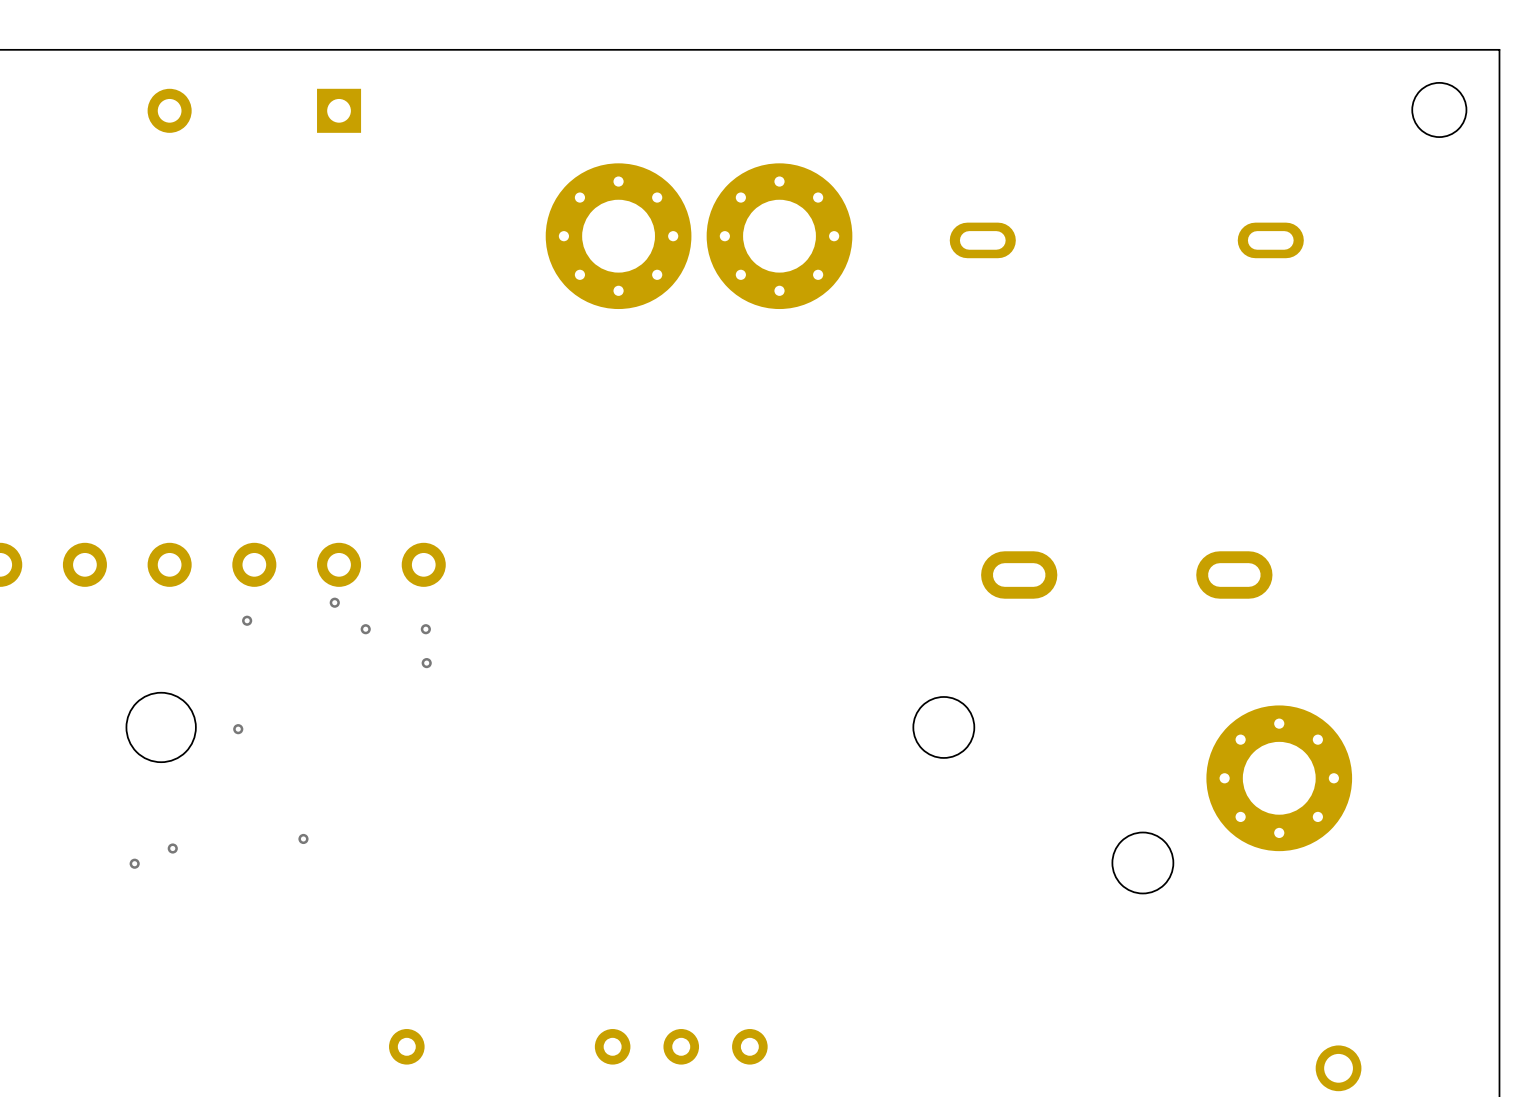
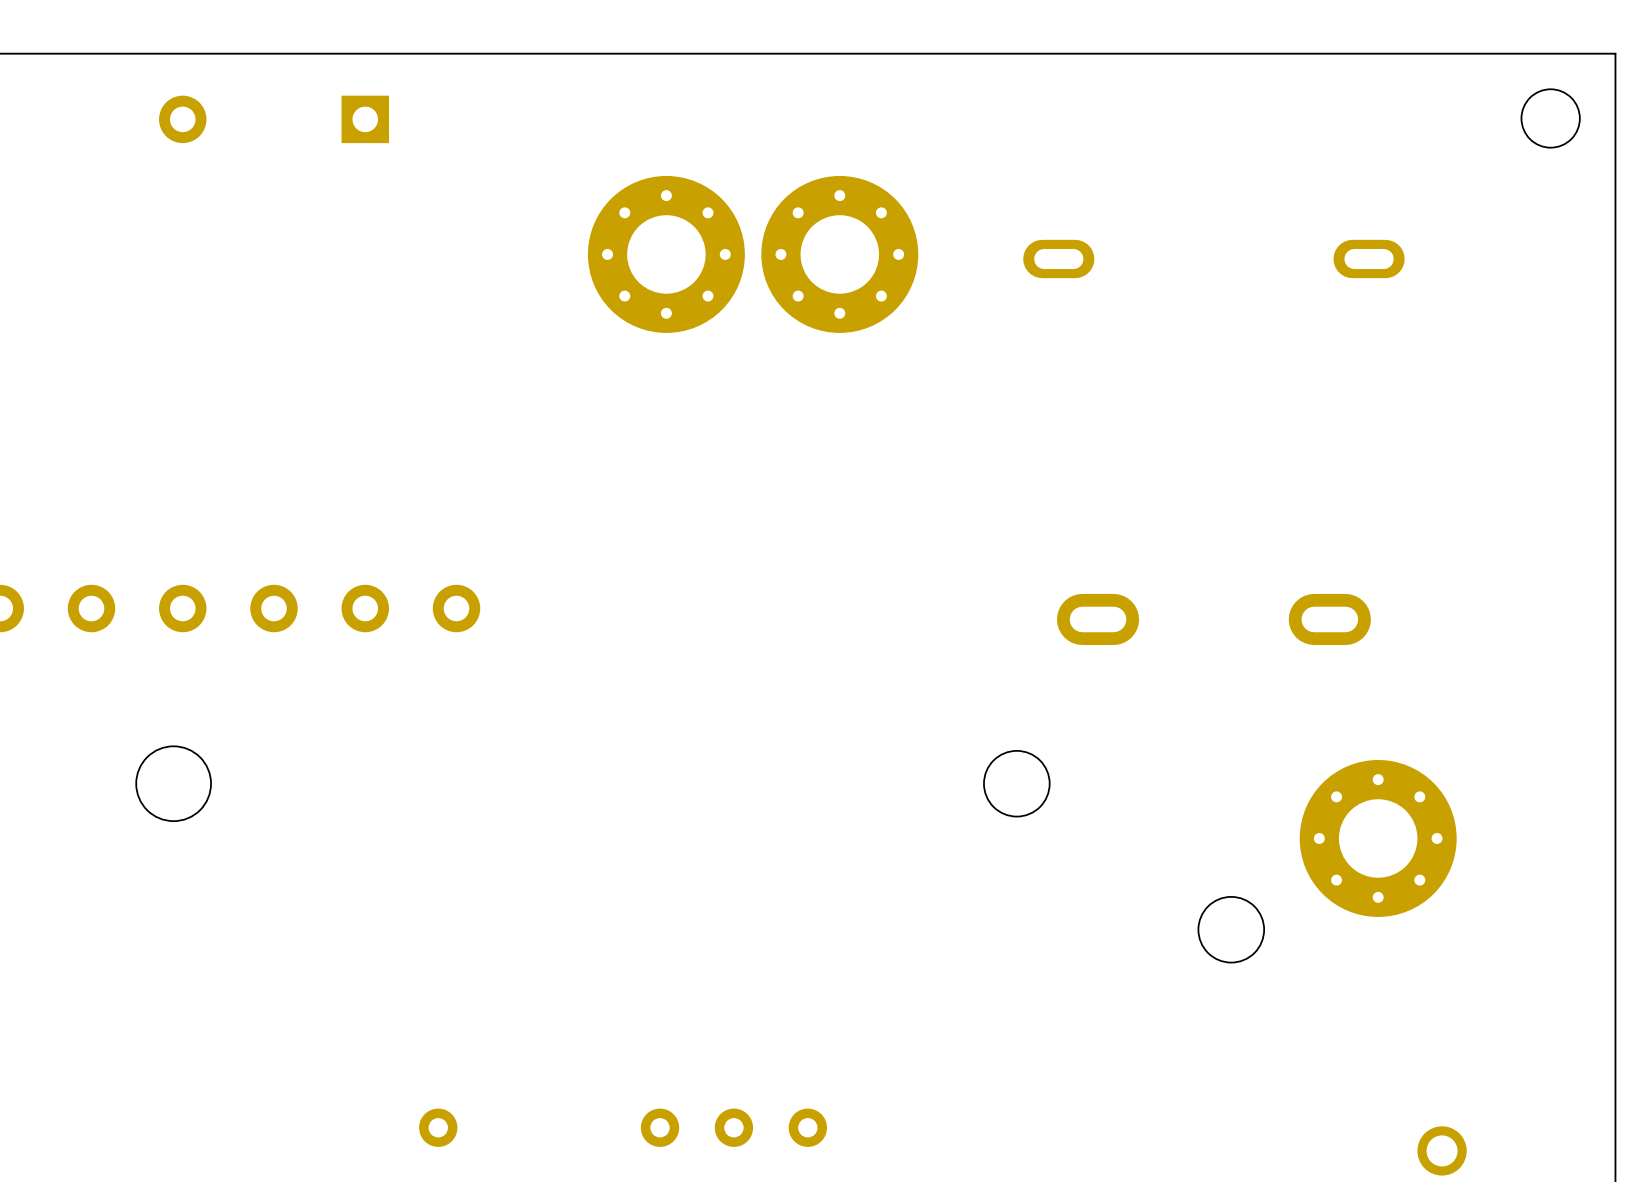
via: (334, 602) -> none
via: (247, 620) -> none
via: (365, 629) -> none
via: (425, 629) -> none
via: (426, 663) -> none
via: (238, 729) -> none
via: (303, 838) -> none
via: (172, 848) -> none
via: (134, 863) -> none

